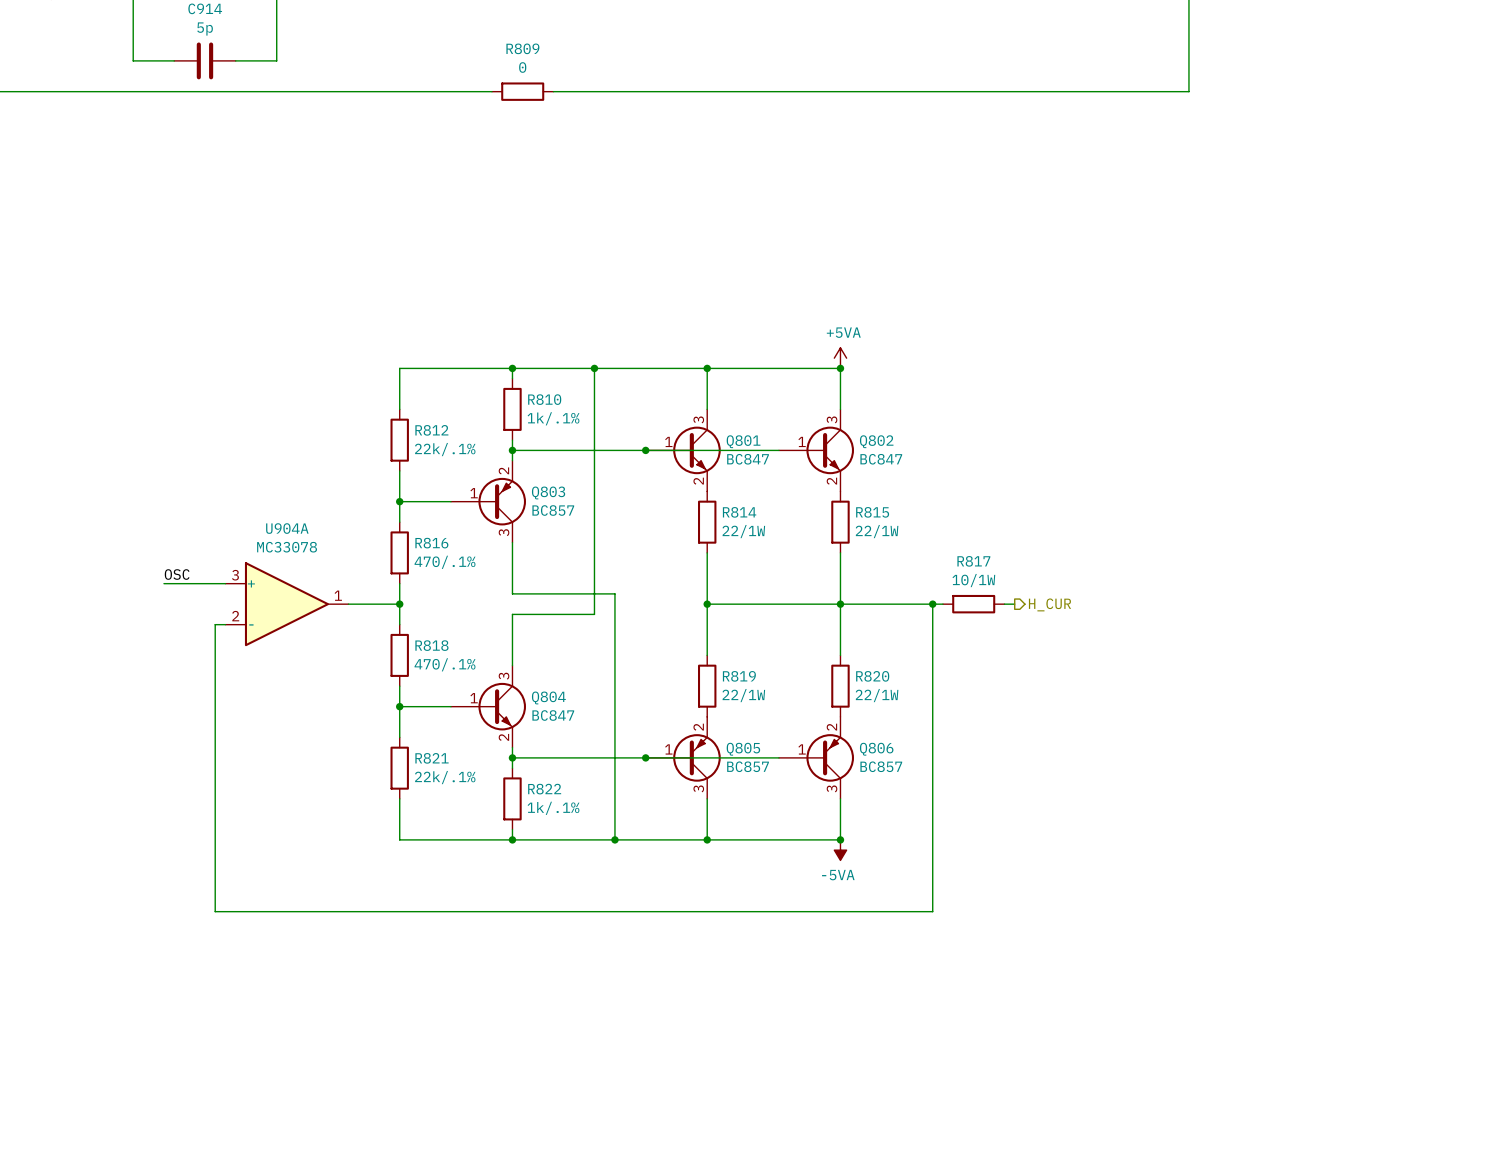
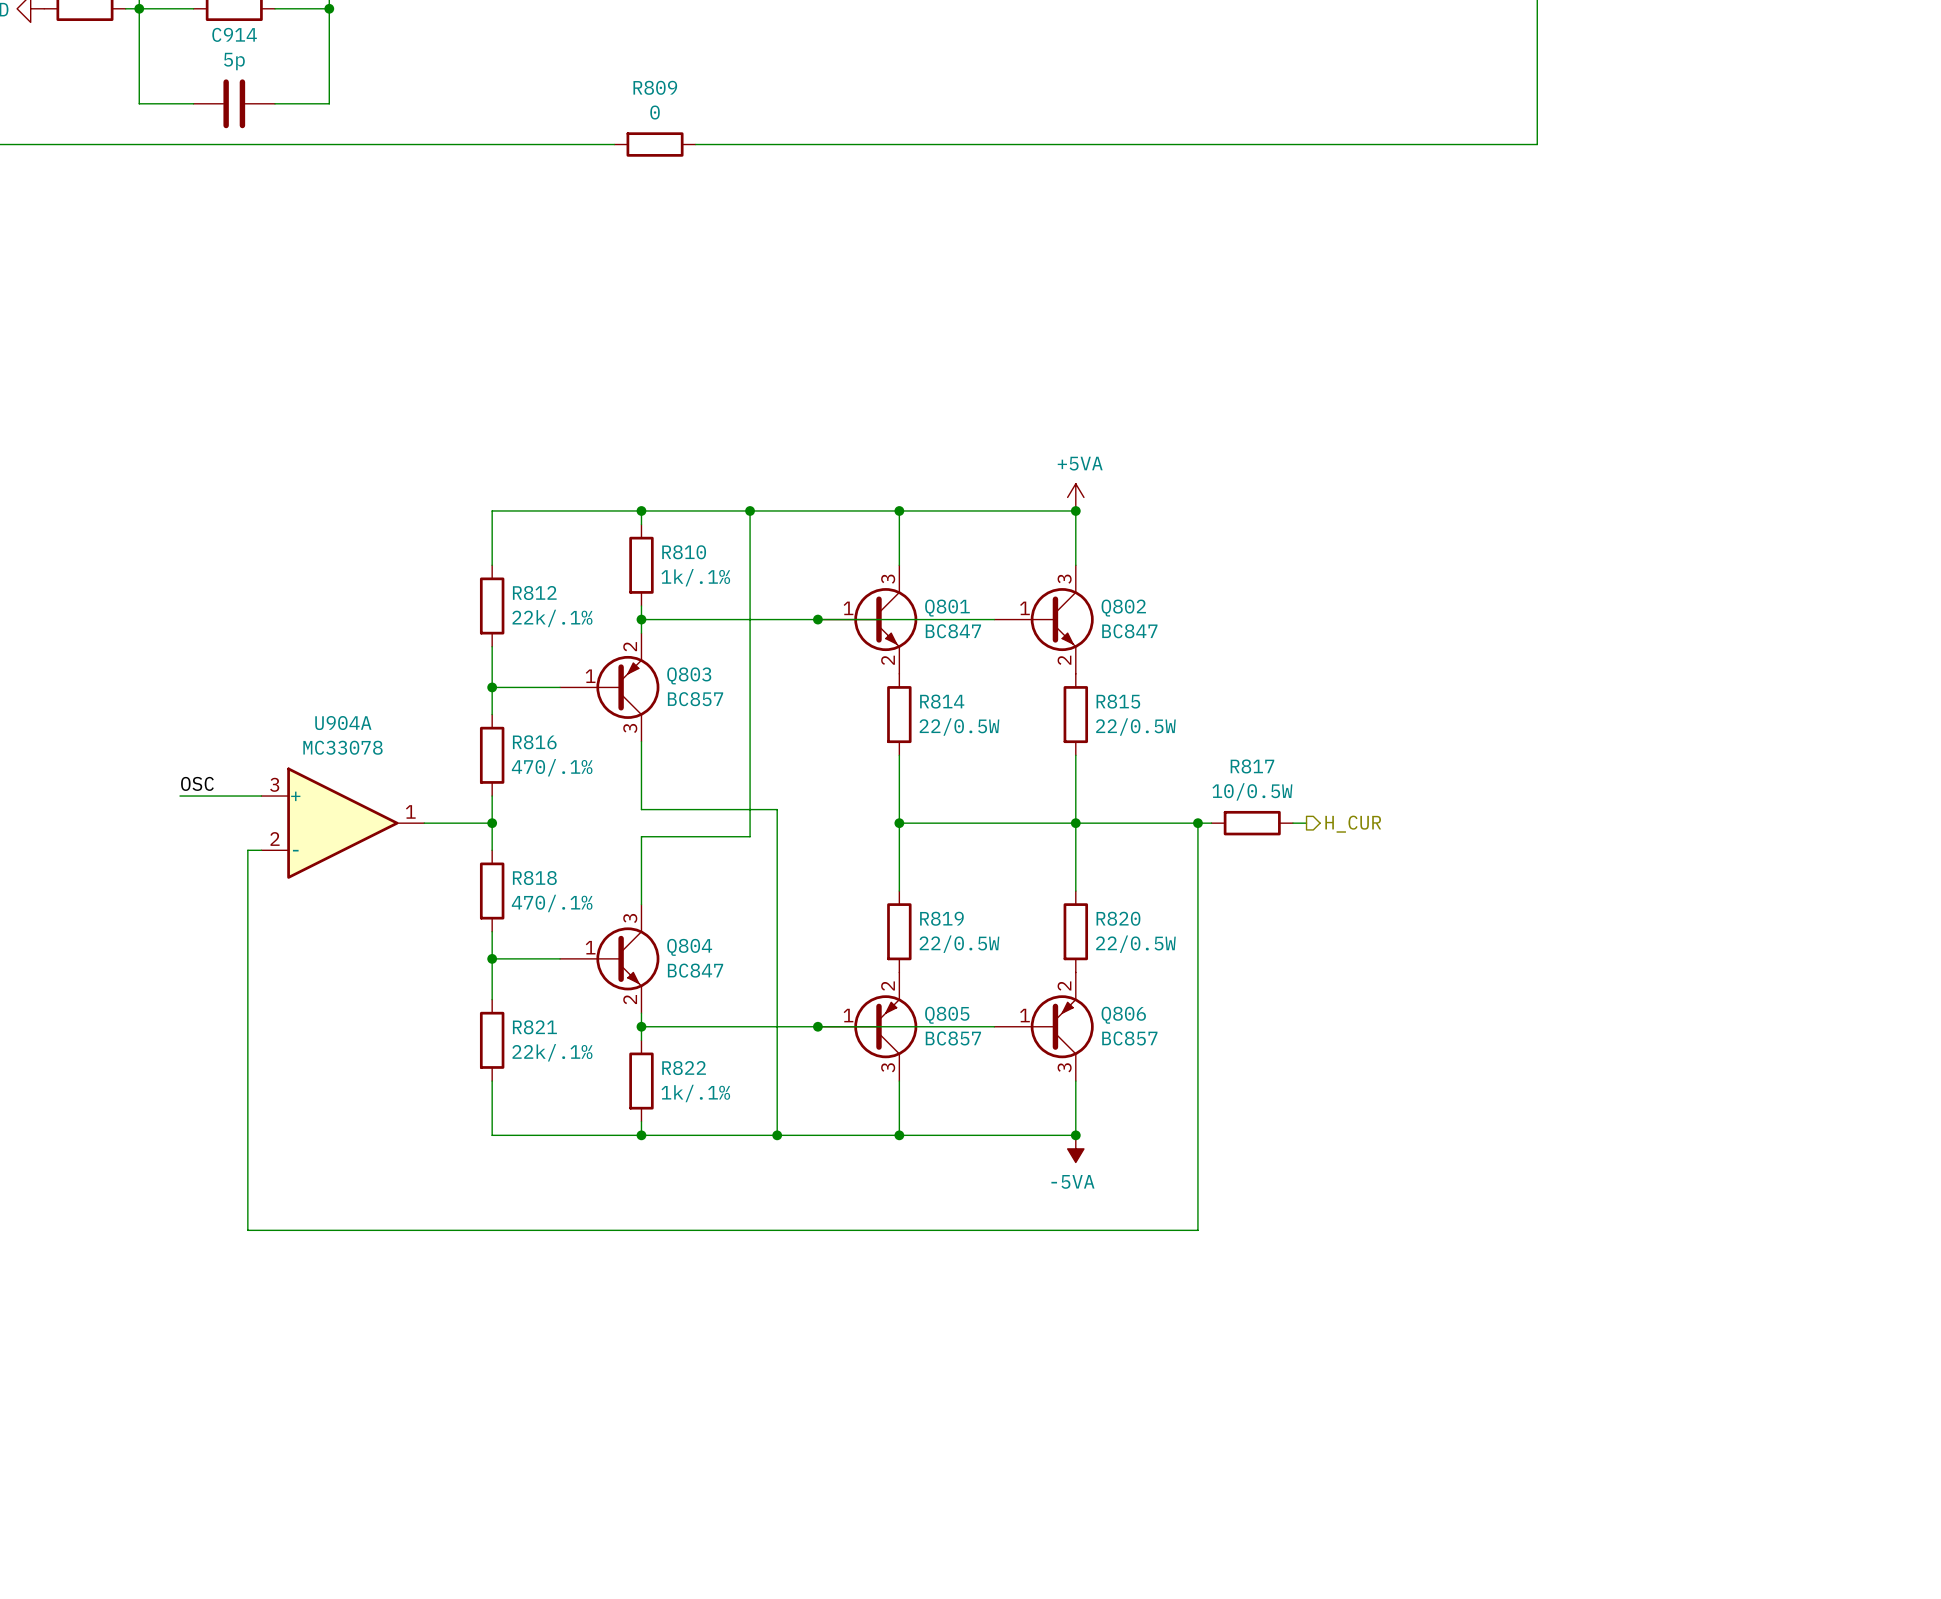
R814 value: 22/1W (743, 531) -> 22/0.5W (959, 727)
R815 value: 22/1W (877, 531) -> 22/0.5W (1135, 727)
R817 value: 10/1W (973, 580) -> 10/0.5W (1252, 791)
R819 value: 22/1W (743, 695) -> 22/0.5W (959, 944)
R820 value: 22/1W (877, 695) -> 22/0.5W (1135, 944)

